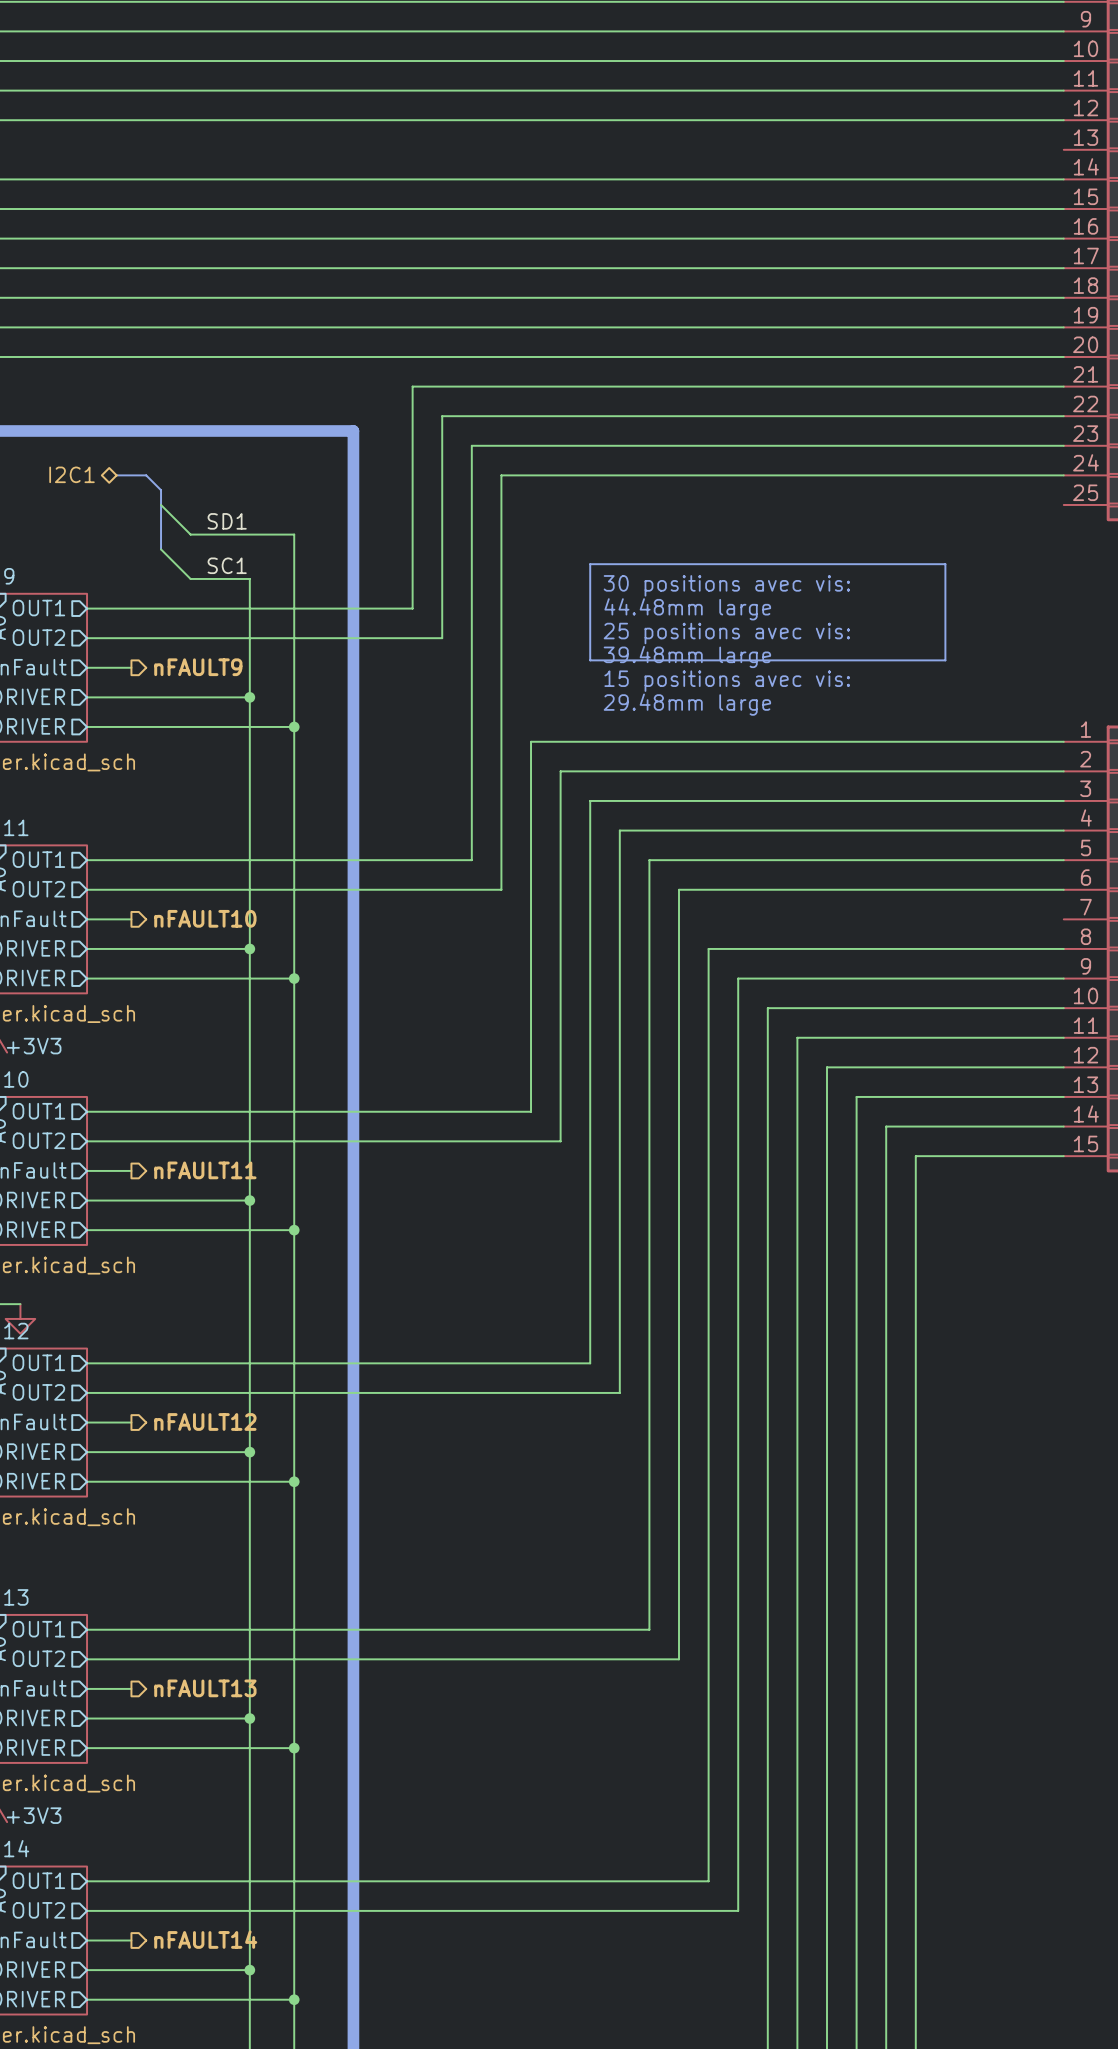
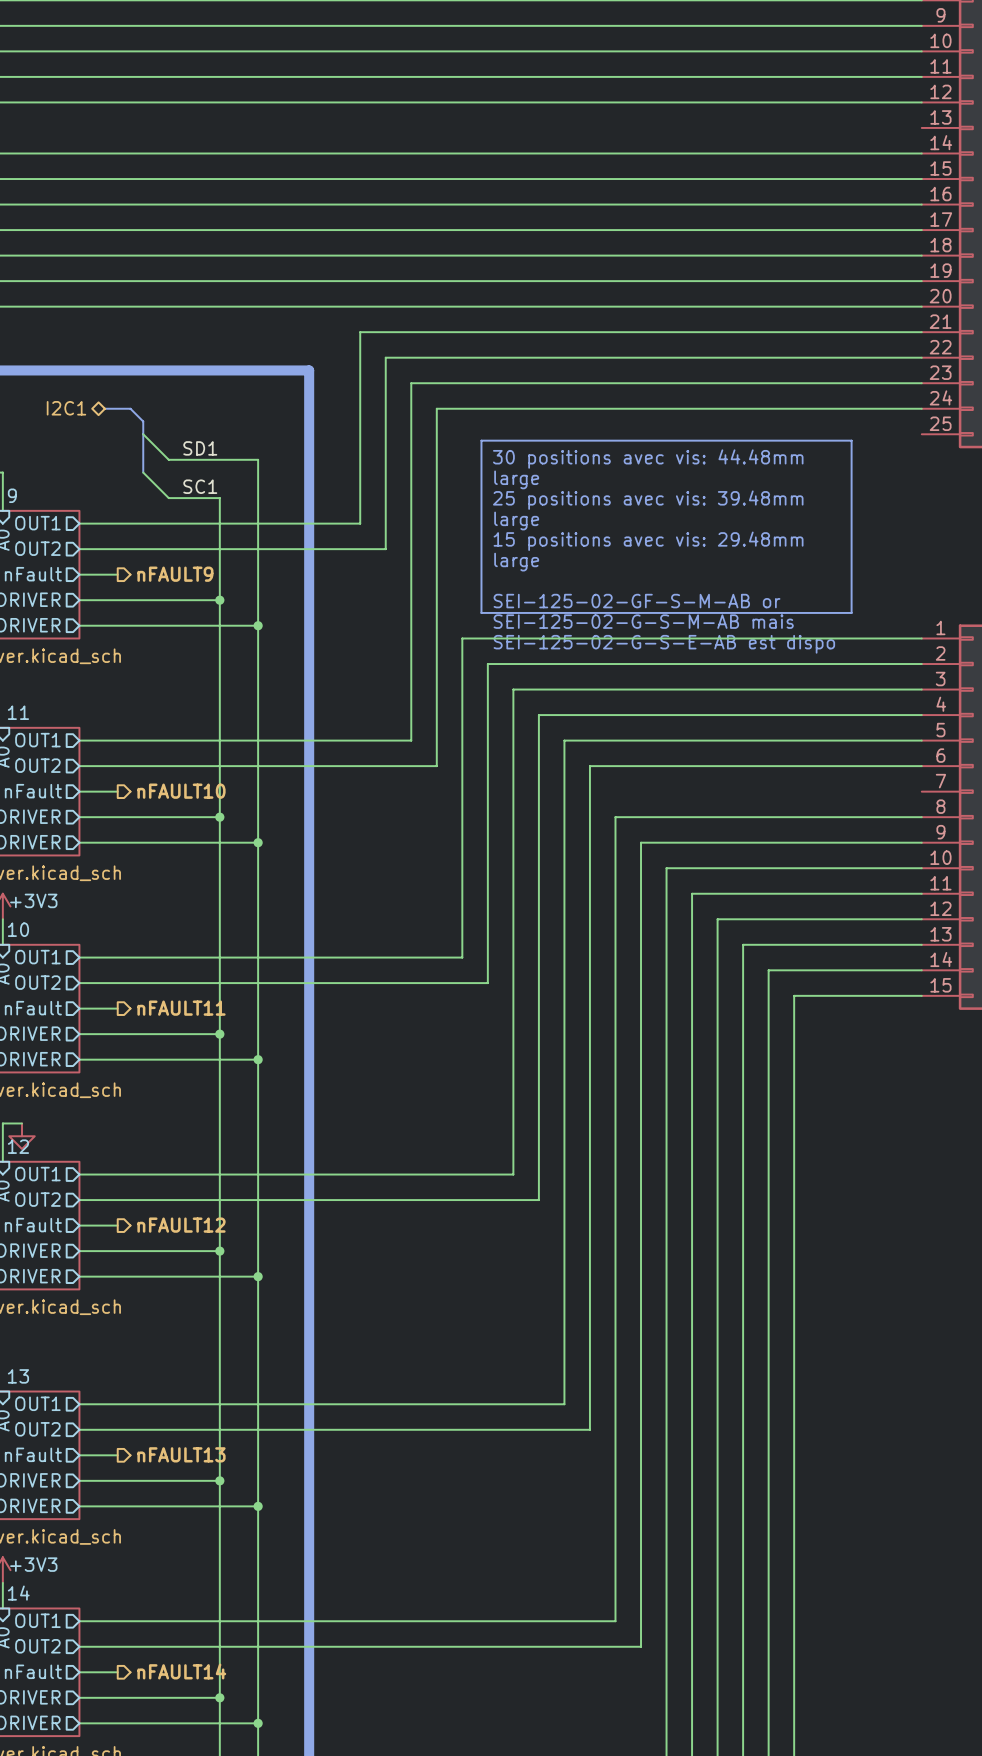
line: none -> (481, 440) (851, 440) (851, 612) (481, 612) (481, 440)
text: none -> 30 positions avec vis: 44.48mm (648, 459)
text: none -> large (516, 479)
line: (590, 564) (945, 564) (945, 660) (590, 660) (590, 564) -> none
text: 30 positions avec vis: (726, 585) -> 25 positions avec vis: 39.48mm (648, 500)
text: none -> large (516, 520)
text: 44.48mm large (687, 609) -> none
text: 25 positions avec vis: (726, 633) -> 15 positions avec vis: 29.48mm (648, 541)
text: none -> large (516, 562)
text: 39.48mm large (687, 656) -> none
text: 15 positions avec vis: (727, 681) -> none
text: none -> SEI-125-02-GF-S-M-AB or (637, 601)
text: 29.48mm large (687, 704) -> none
text: none -> SEI-125-02-G-S-M-AB mais (643, 621)
text: none -> SEI-125-02-G-S-E-AB est dispo (664, 644)

